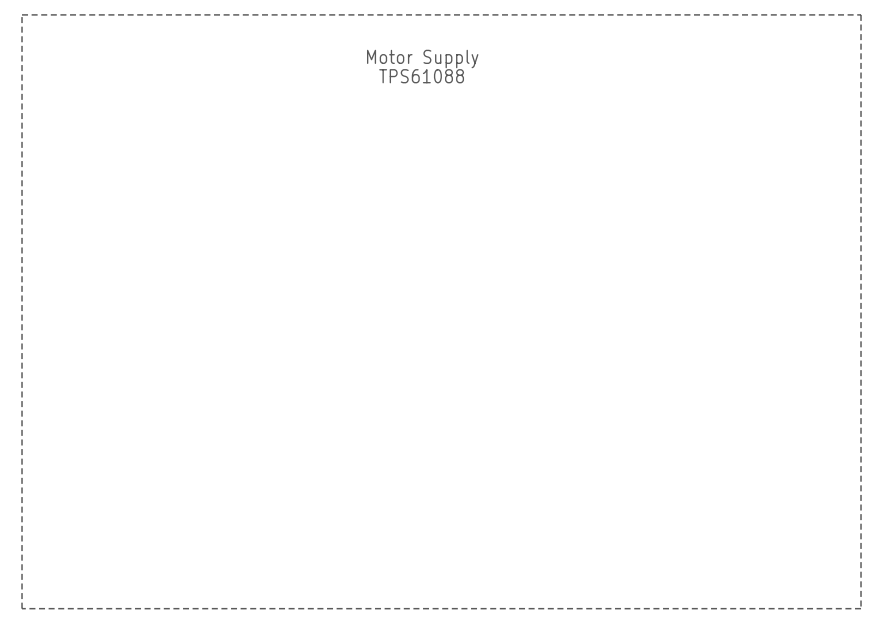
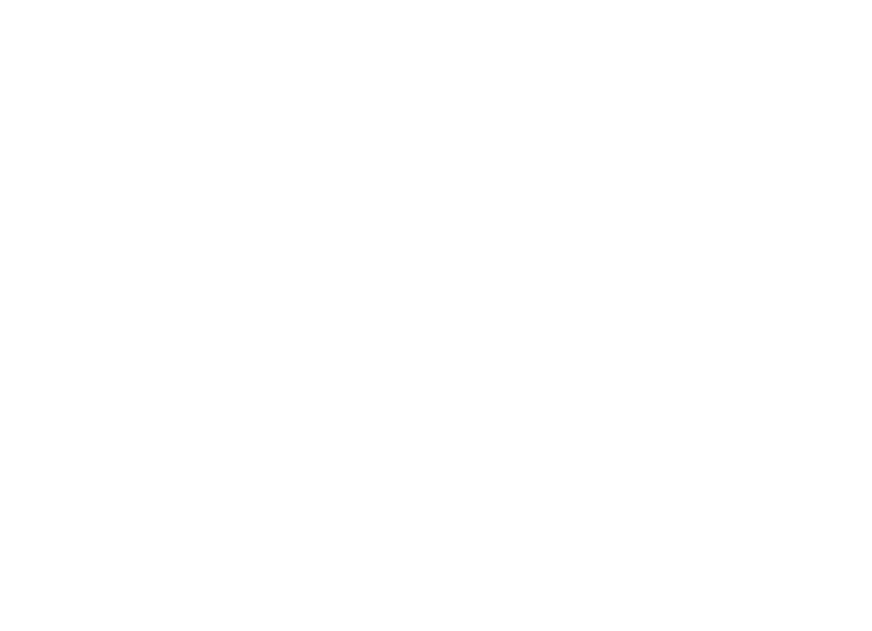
line: (22, 14) (861, 14) (861, 608) (22, 608) (22, 14) -> none
text: Motor Supply (422, 59) -> none
text: TPS61088 (421, 76) -> none

